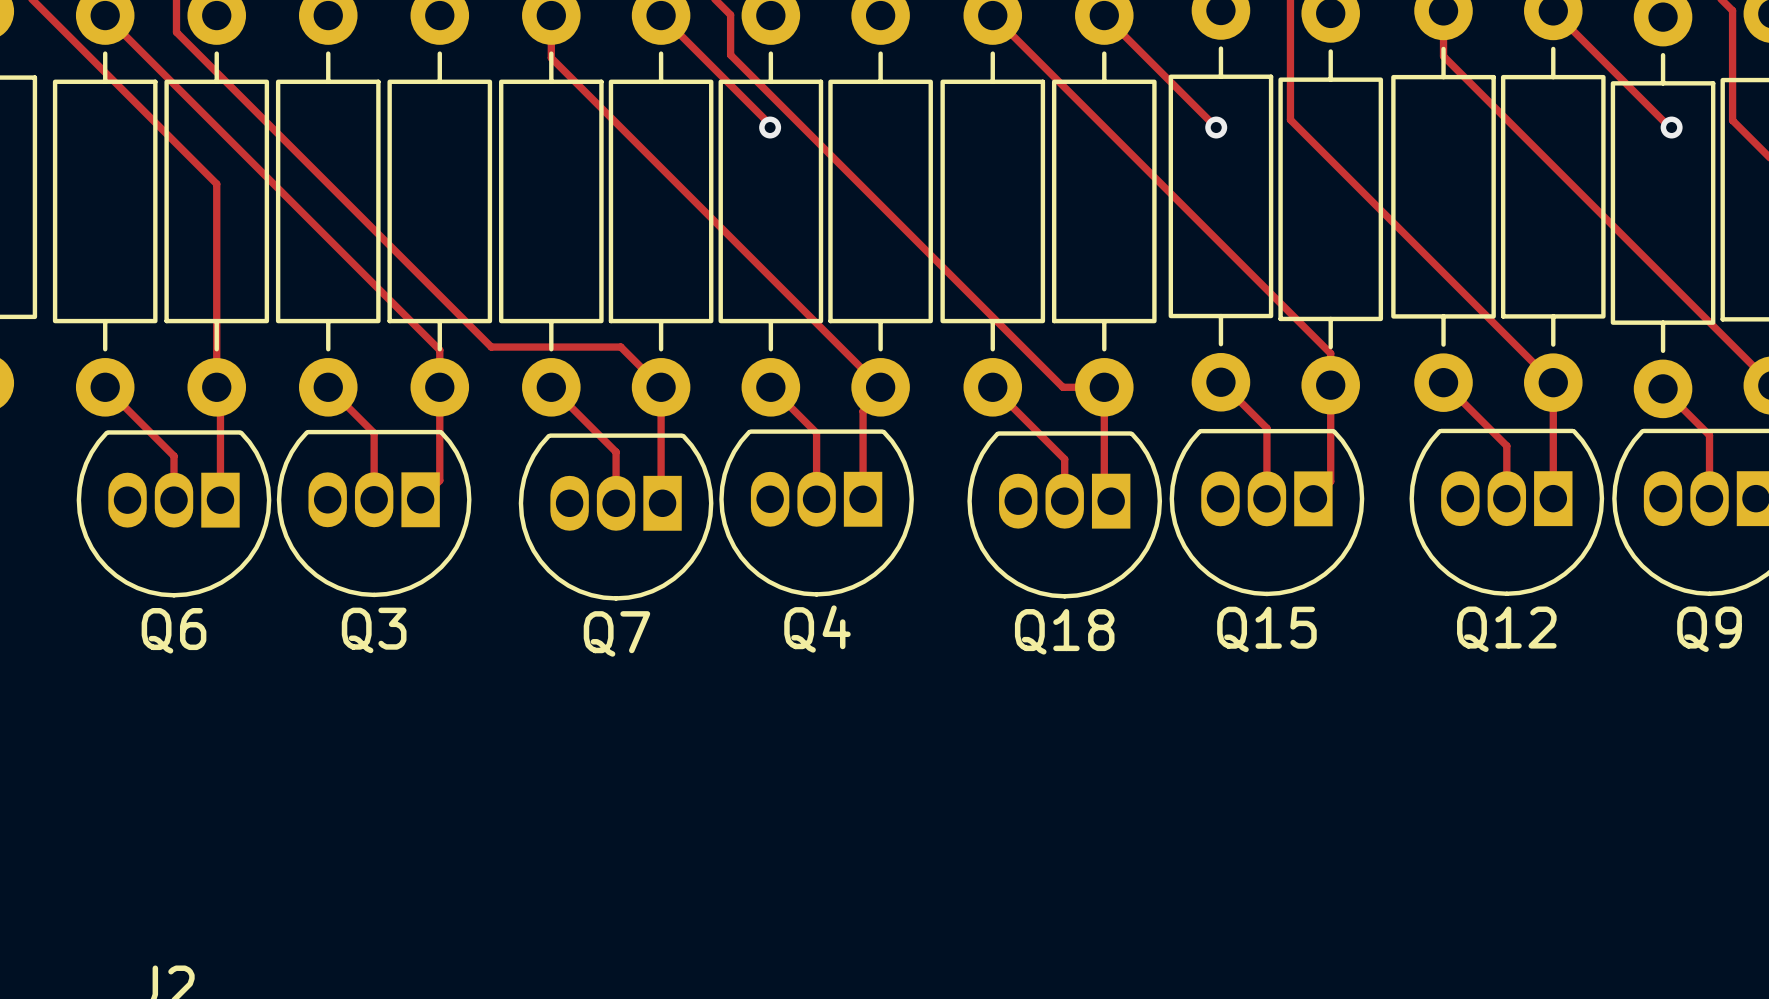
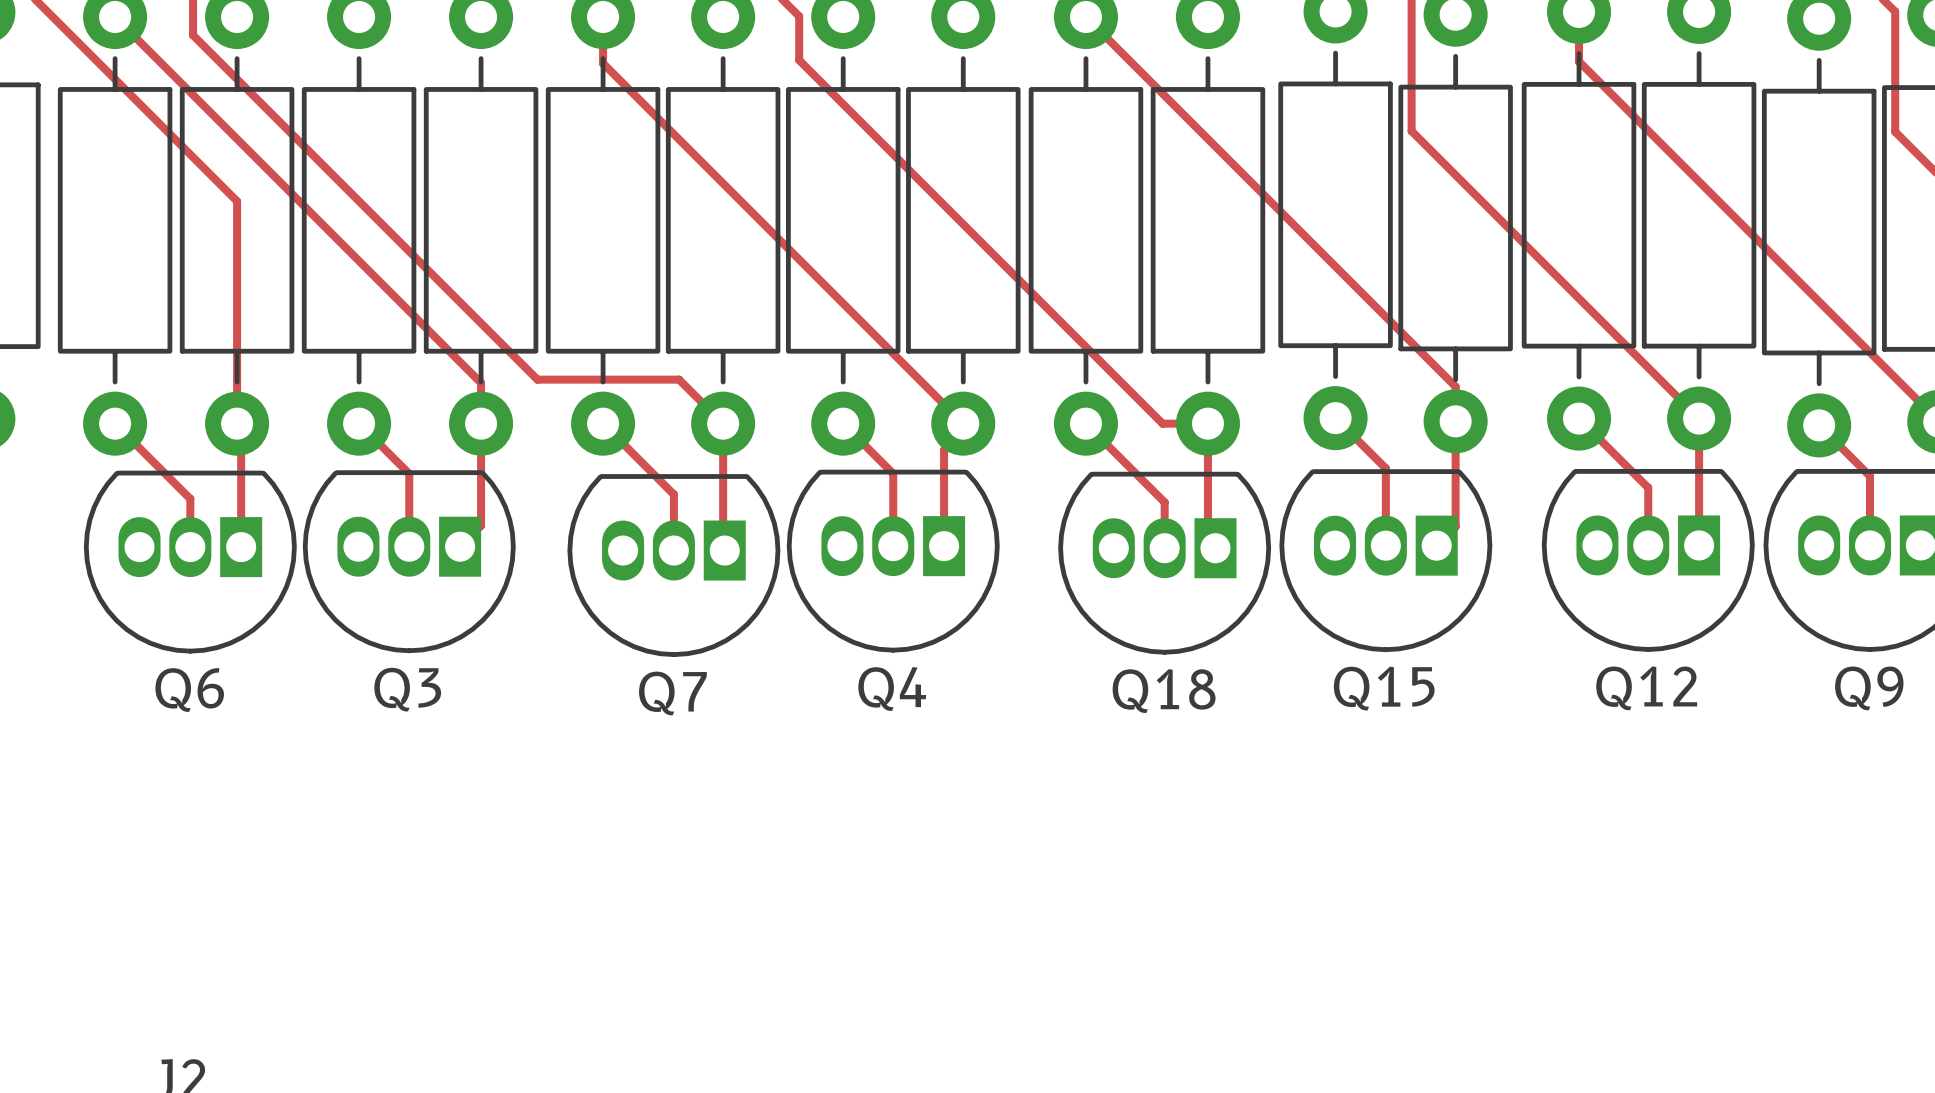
track: (1553, 10) (1669, 127) -> none
track: (661, 15) (770, 124) (770, 127) -> none
track: (1104, 15) (1216, 127) -> none
via: (770, 127) -> none
via: (1216, 127) -> none
via: (1671, 127) -> none

